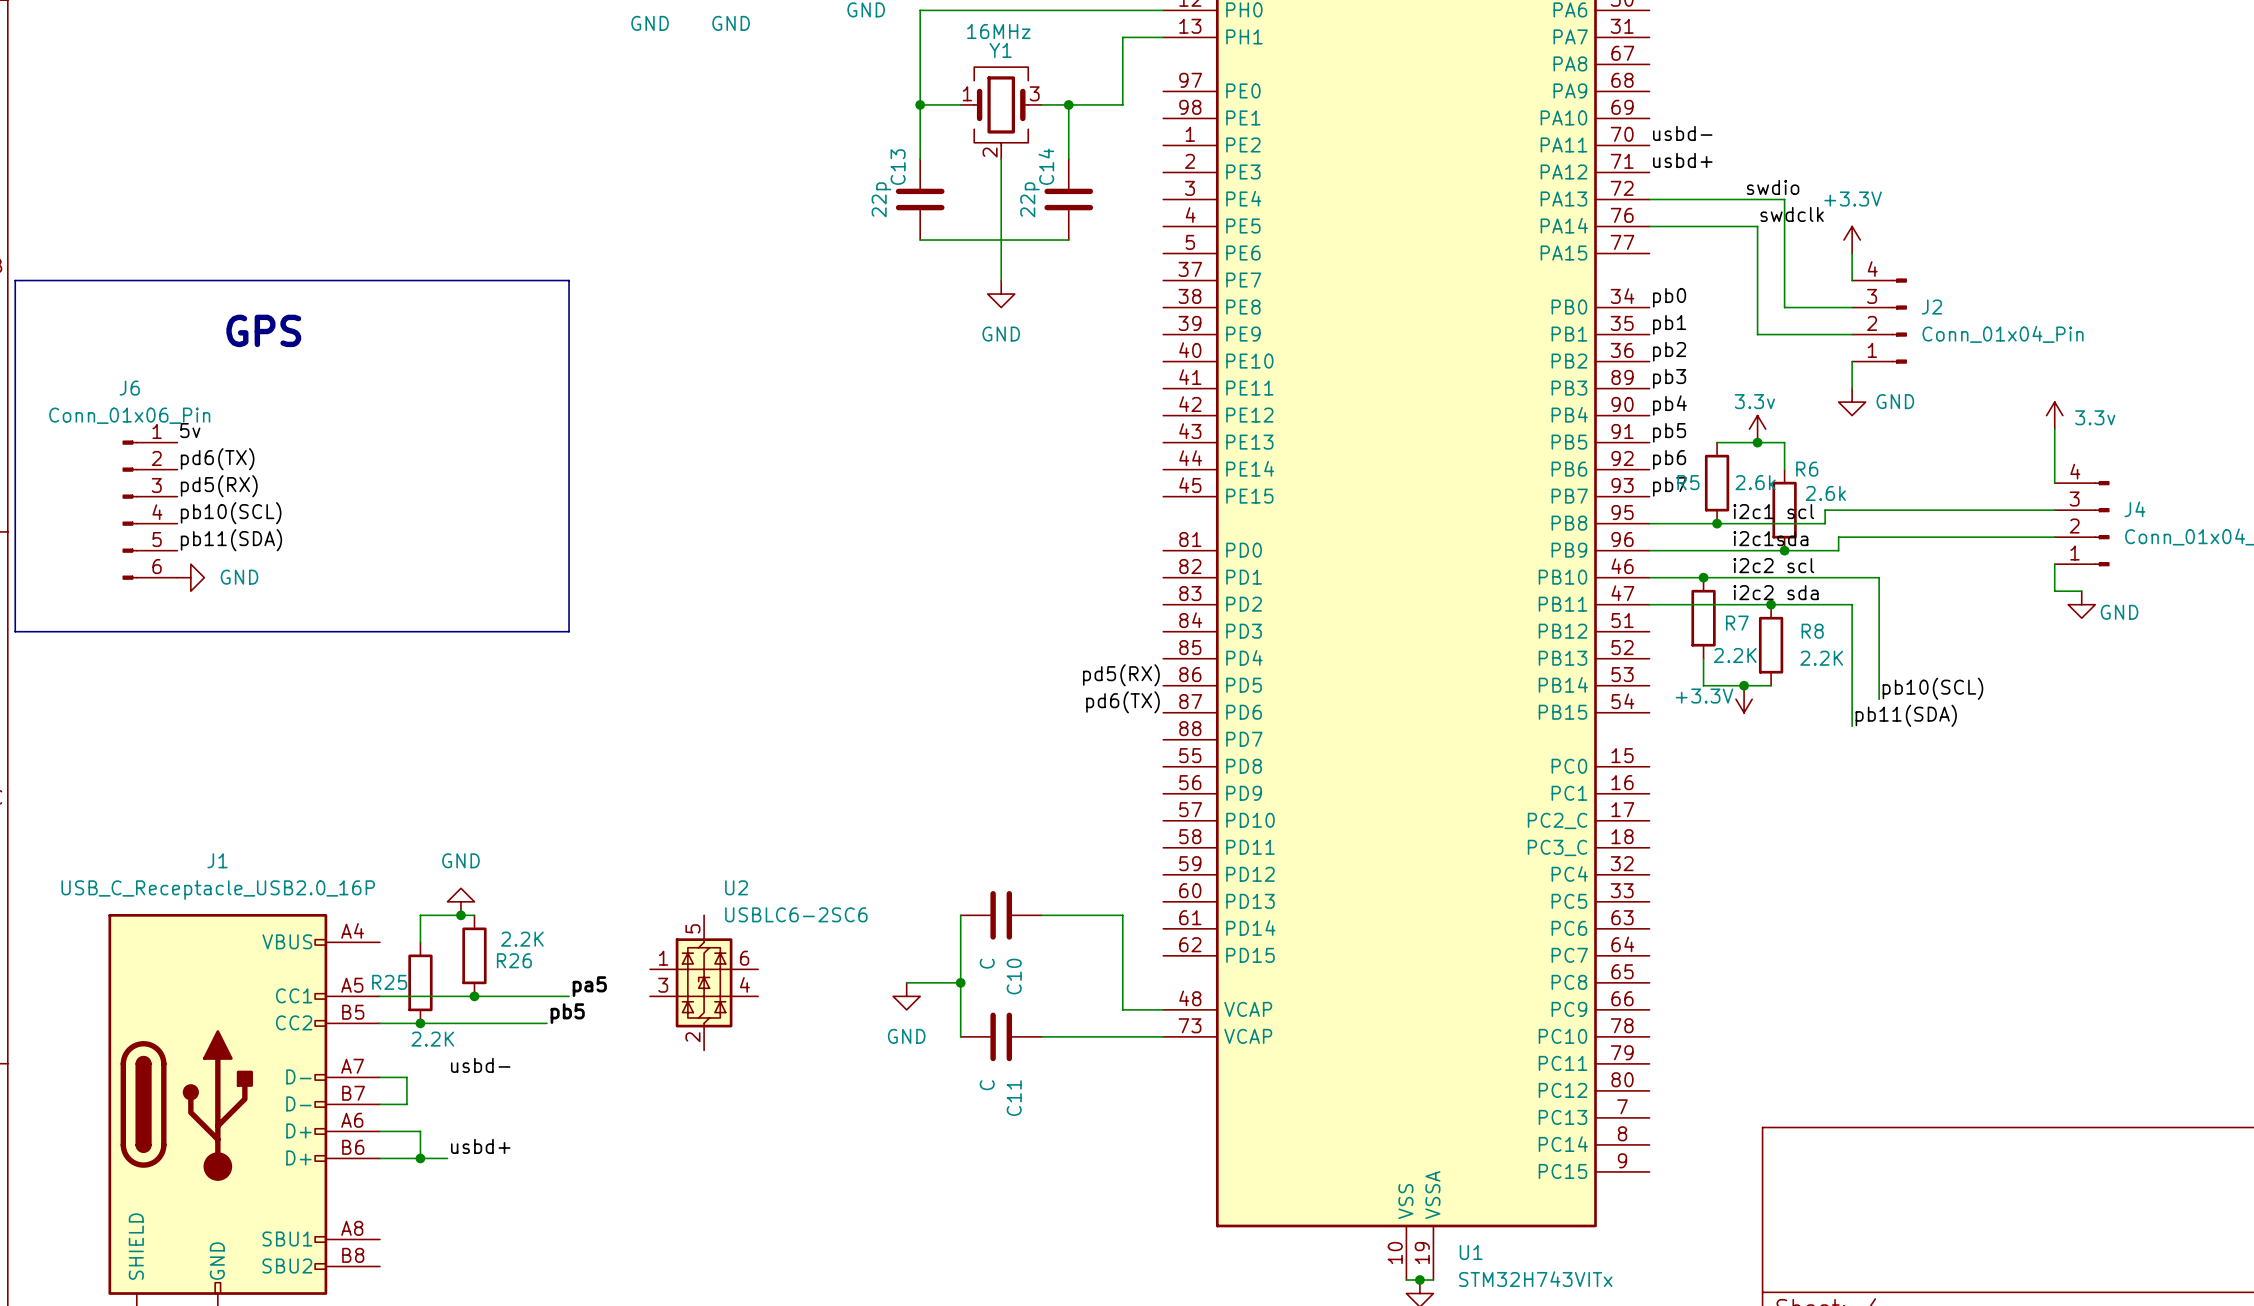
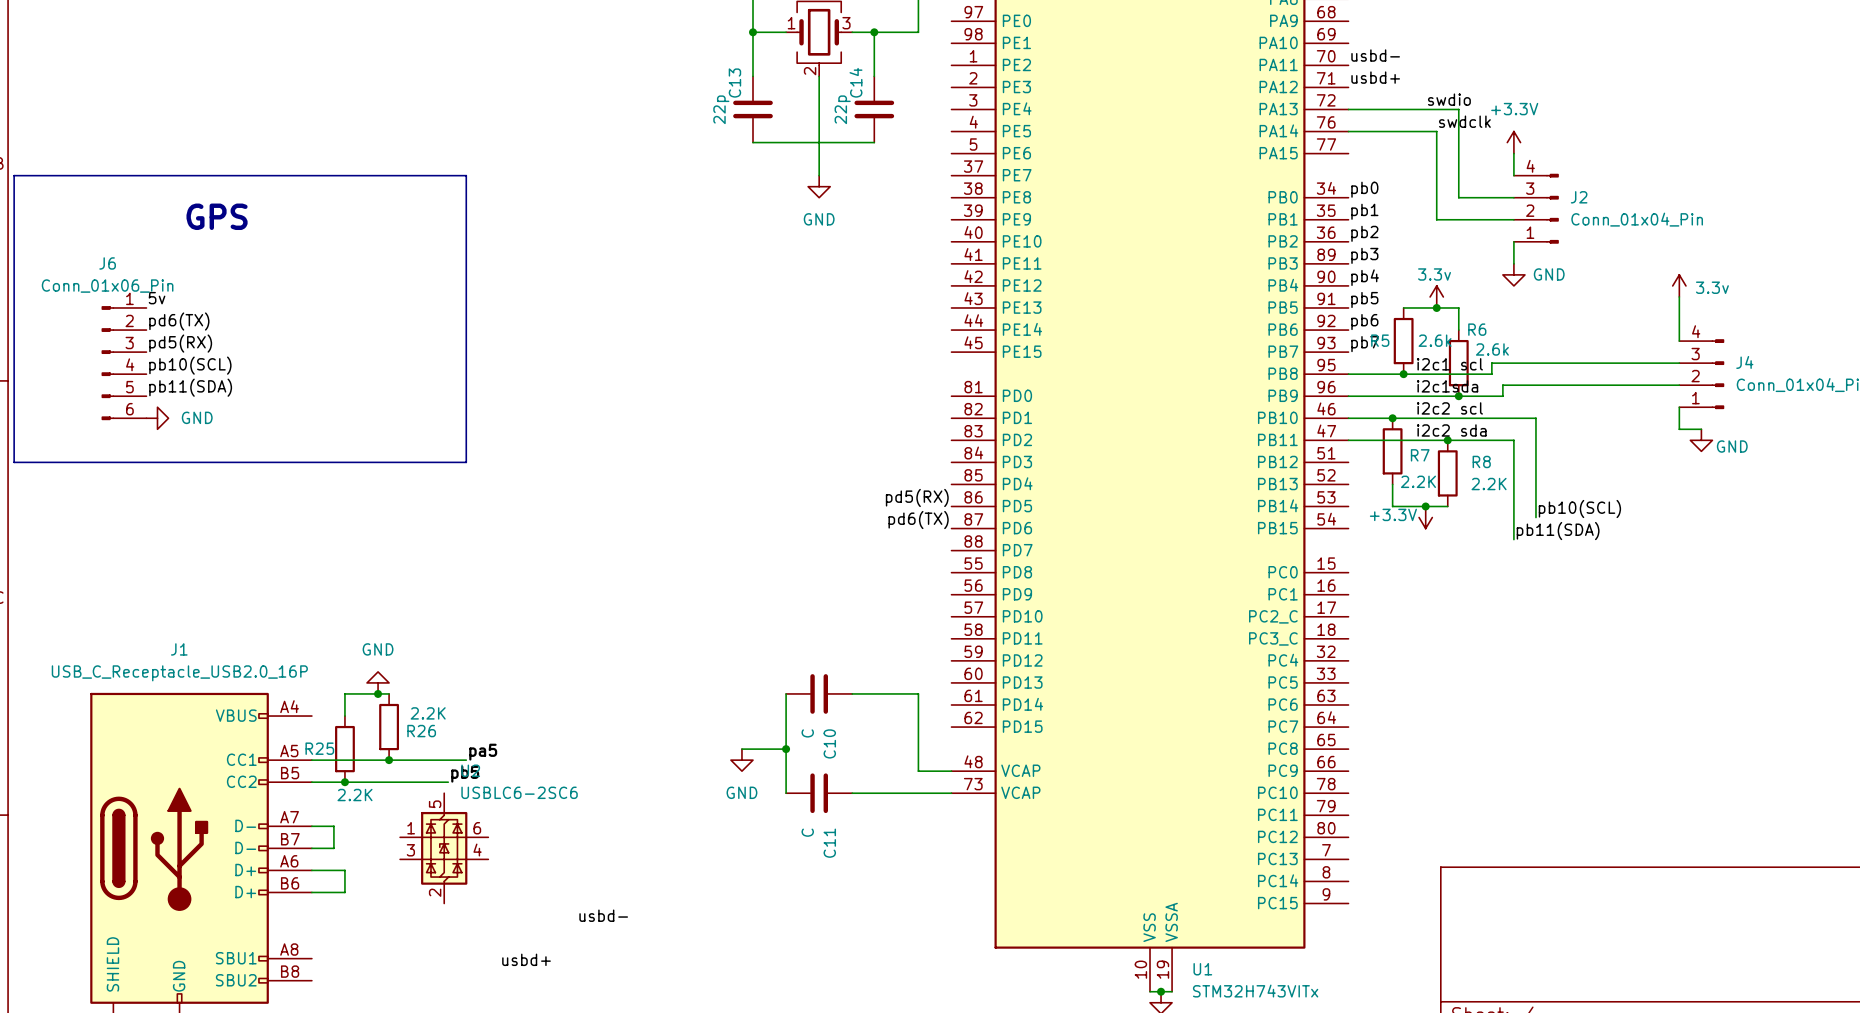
U2 position: (704, 982) -> (444, 848)
label: usbd- (480, 1065) -> none
label position: usbd+ (480, 1146) -> usbd+ (526, 959)
wire: (420, 1158) (447, 1158) -> none
junction: (420, 1158) -> none
label: none -> usbd- (603, 915)

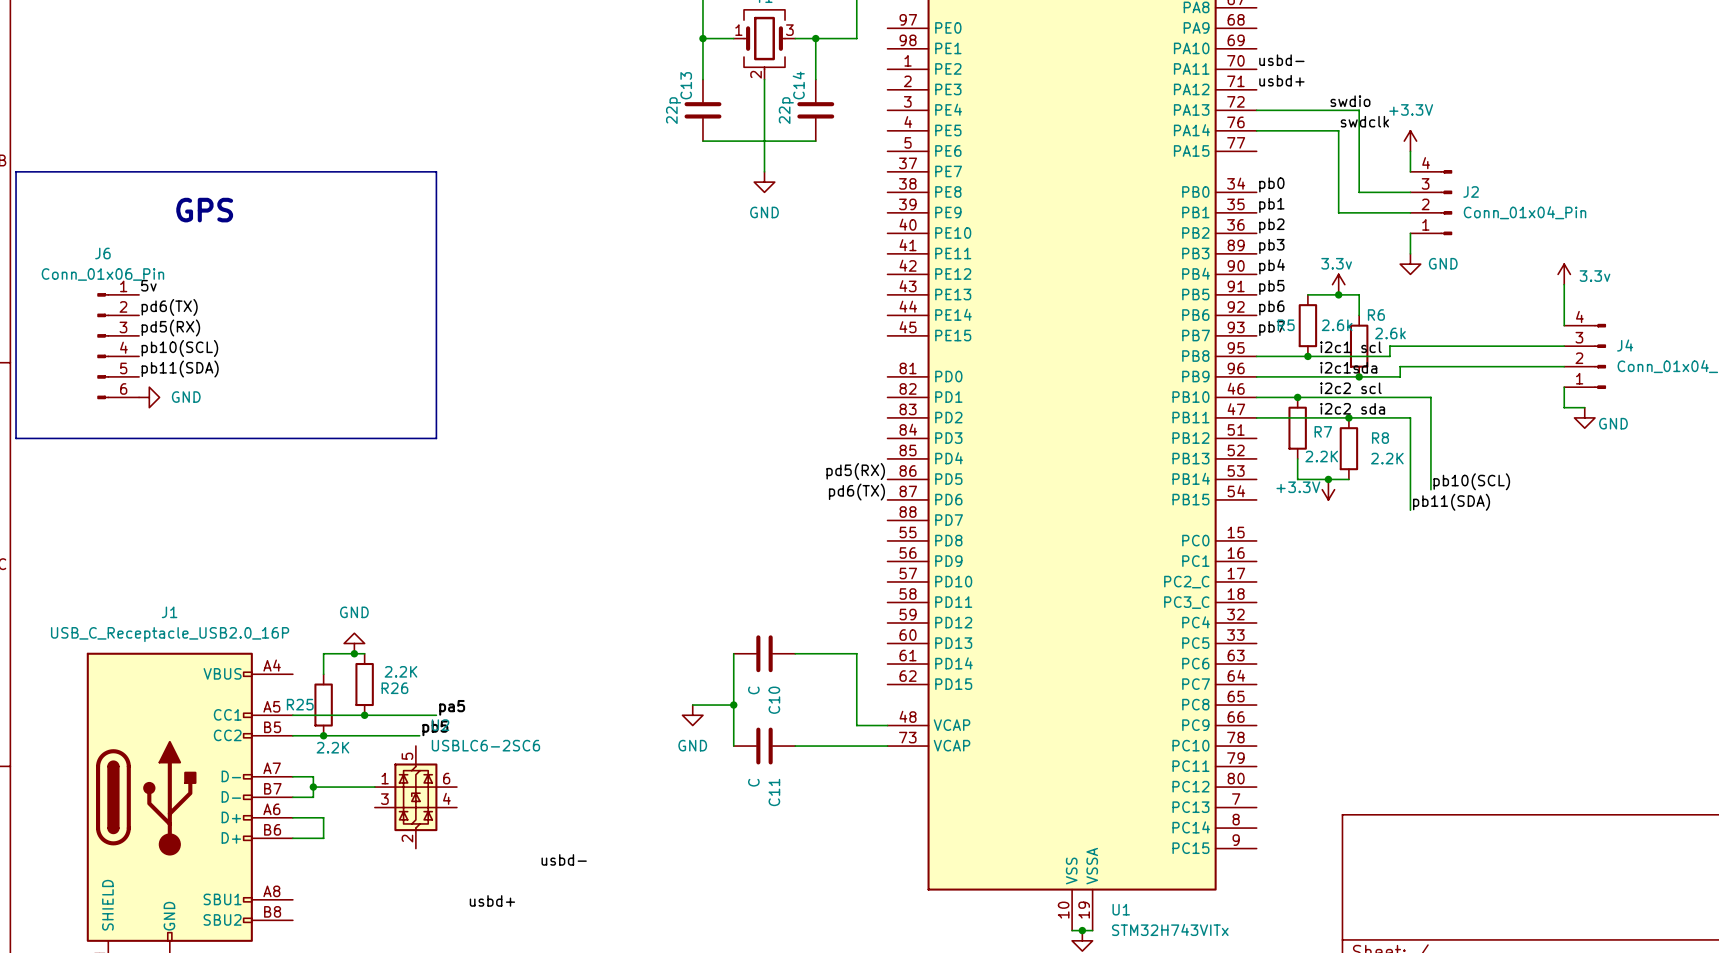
wire: none -> (313, 787) (374, 787)
junction: none -> (313, 787)

